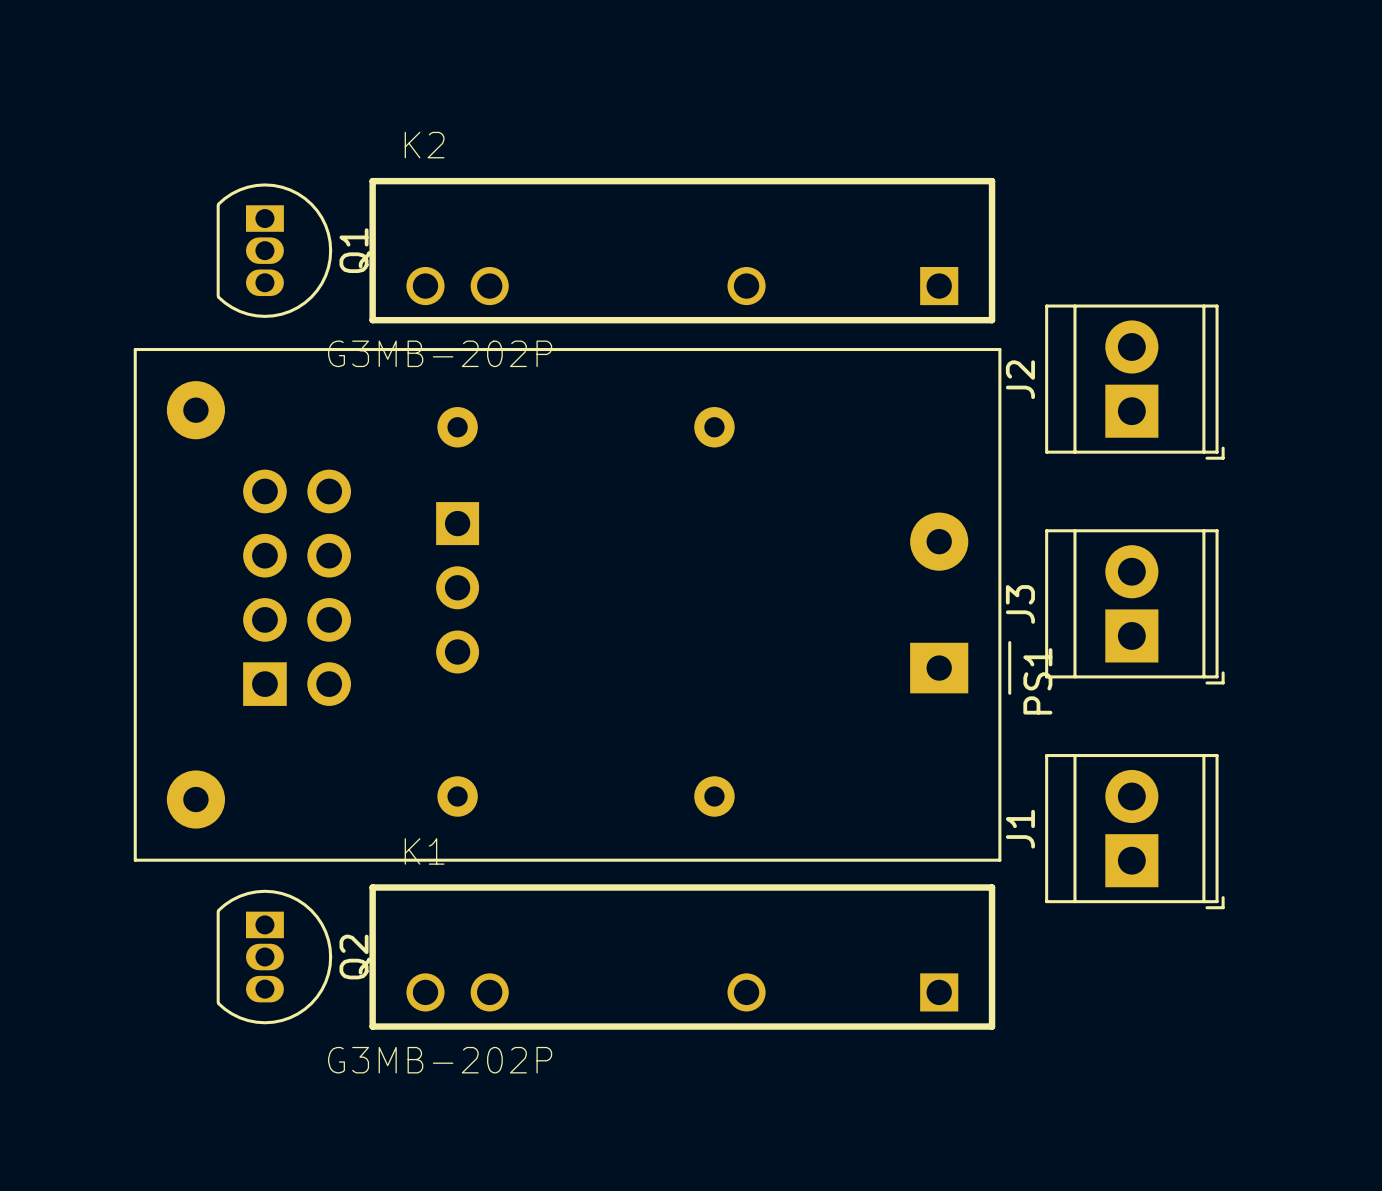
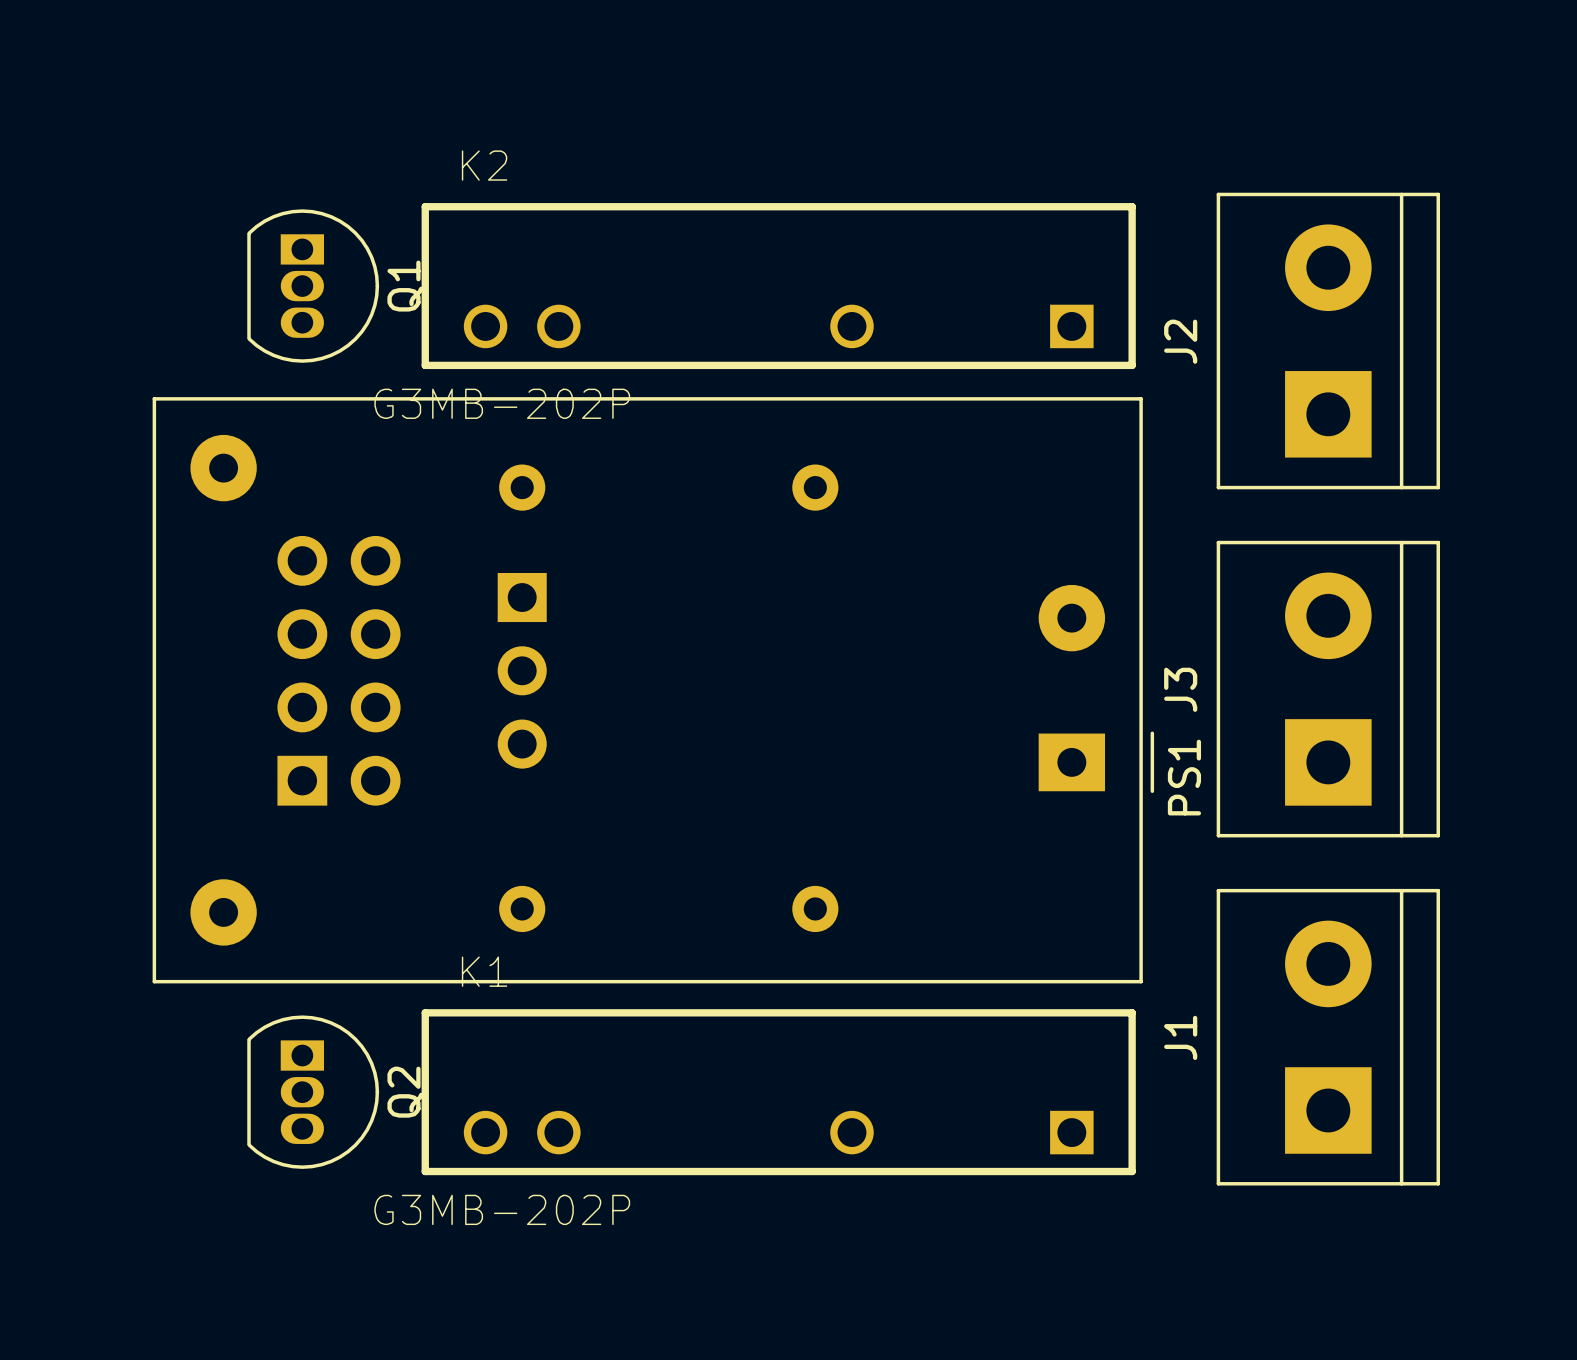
J2 footprint: [1045, 304, 1225, 460] -> [1216, 192, 1440, 490]
J3 footprint: [1045, 529, 1225, 685] -> [1216, 540, 1440, 838]
J1 footprint: [1045, 754, 1225, 910] -> [1216, 888, 1440, 1186]

